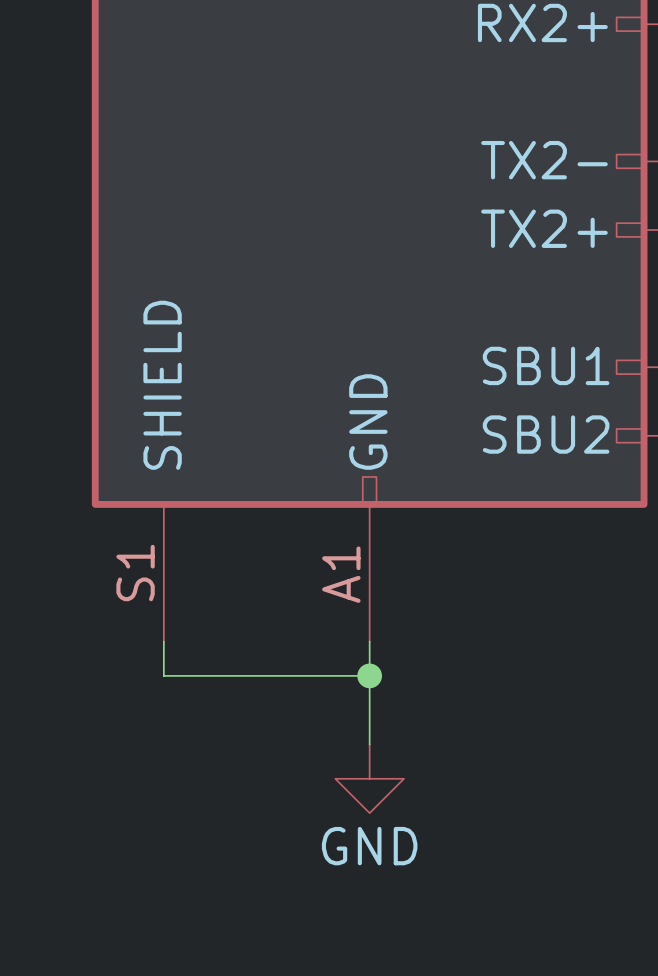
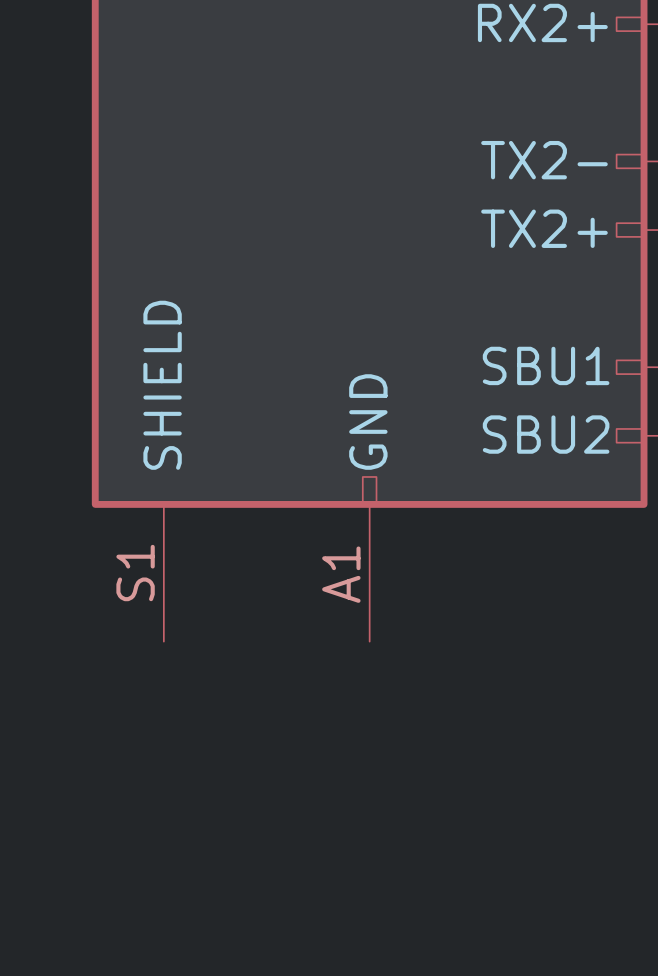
wire: (163, 641) (163, 675) (369, 675) -> none
wire: (369, 641) (369, 744) -> none
junction: (369, 675) -> none
power symbol: GND (369, 778) -> none

